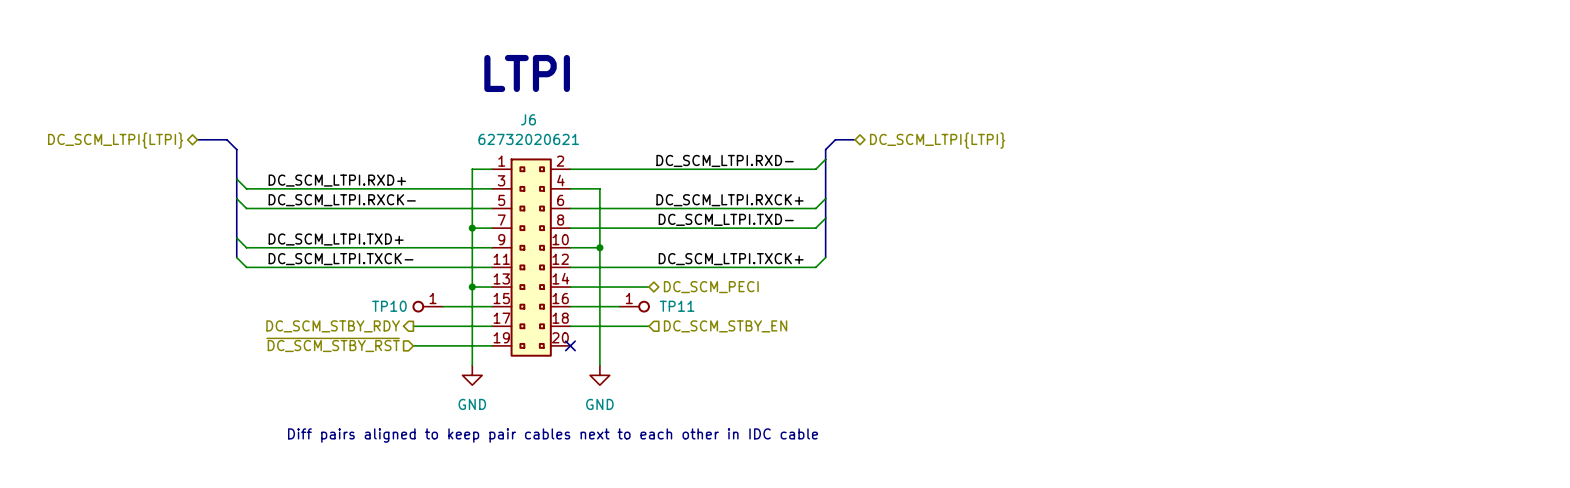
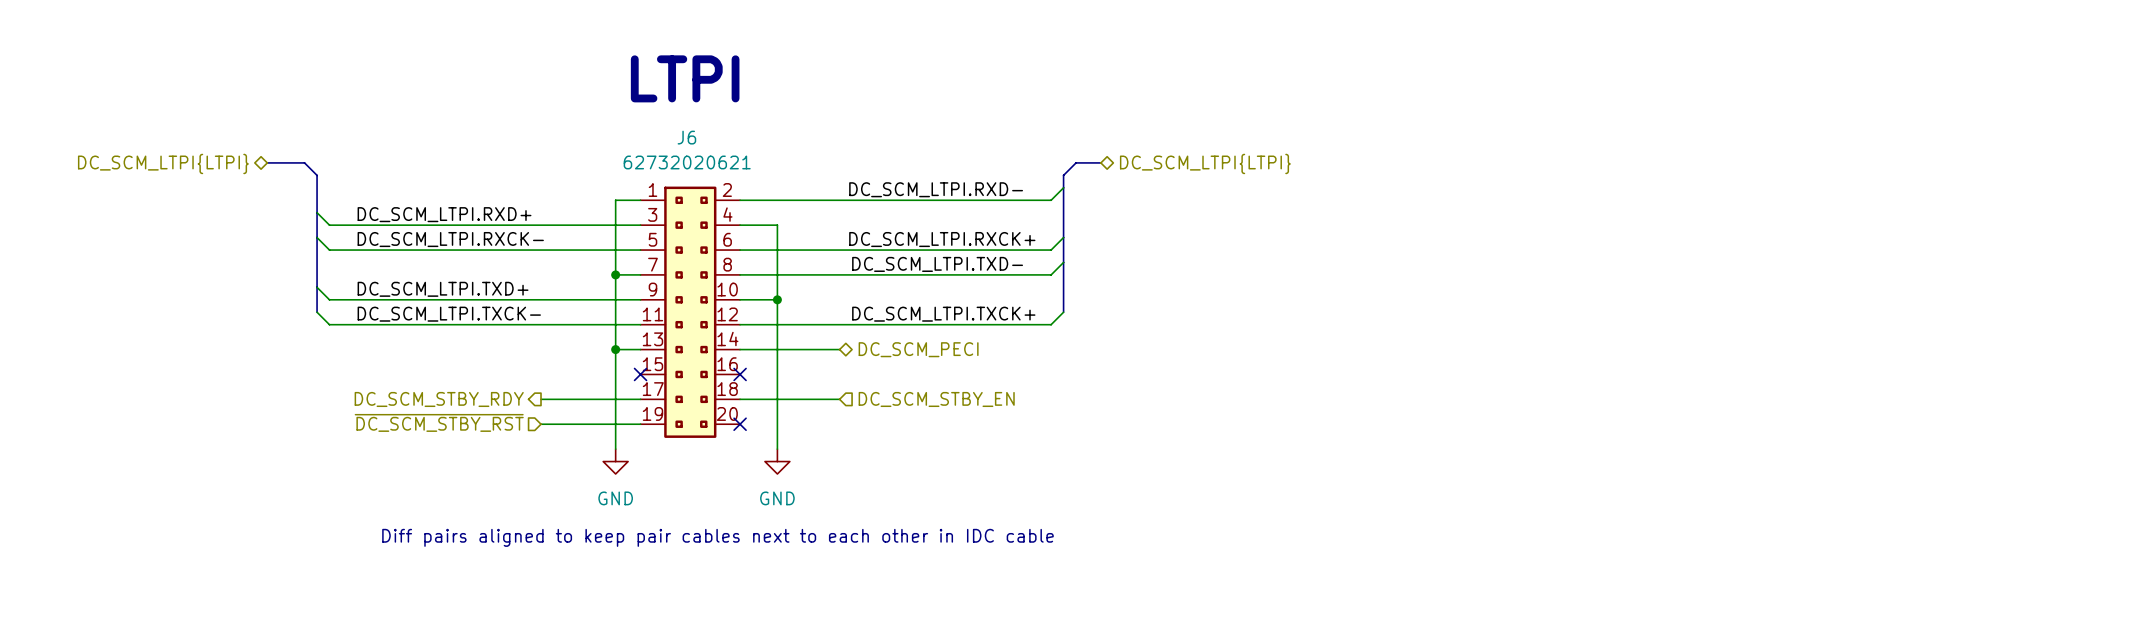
TP10: (427, 306) -> none
wire: (442, 306) (491, 306) -> none
no-connect mark: none -> (640, 374)
wire: (570, 306) (619, 306) -> none
no-connect mark: none -> (740, 374)
TP11: (634, 306) -> none

